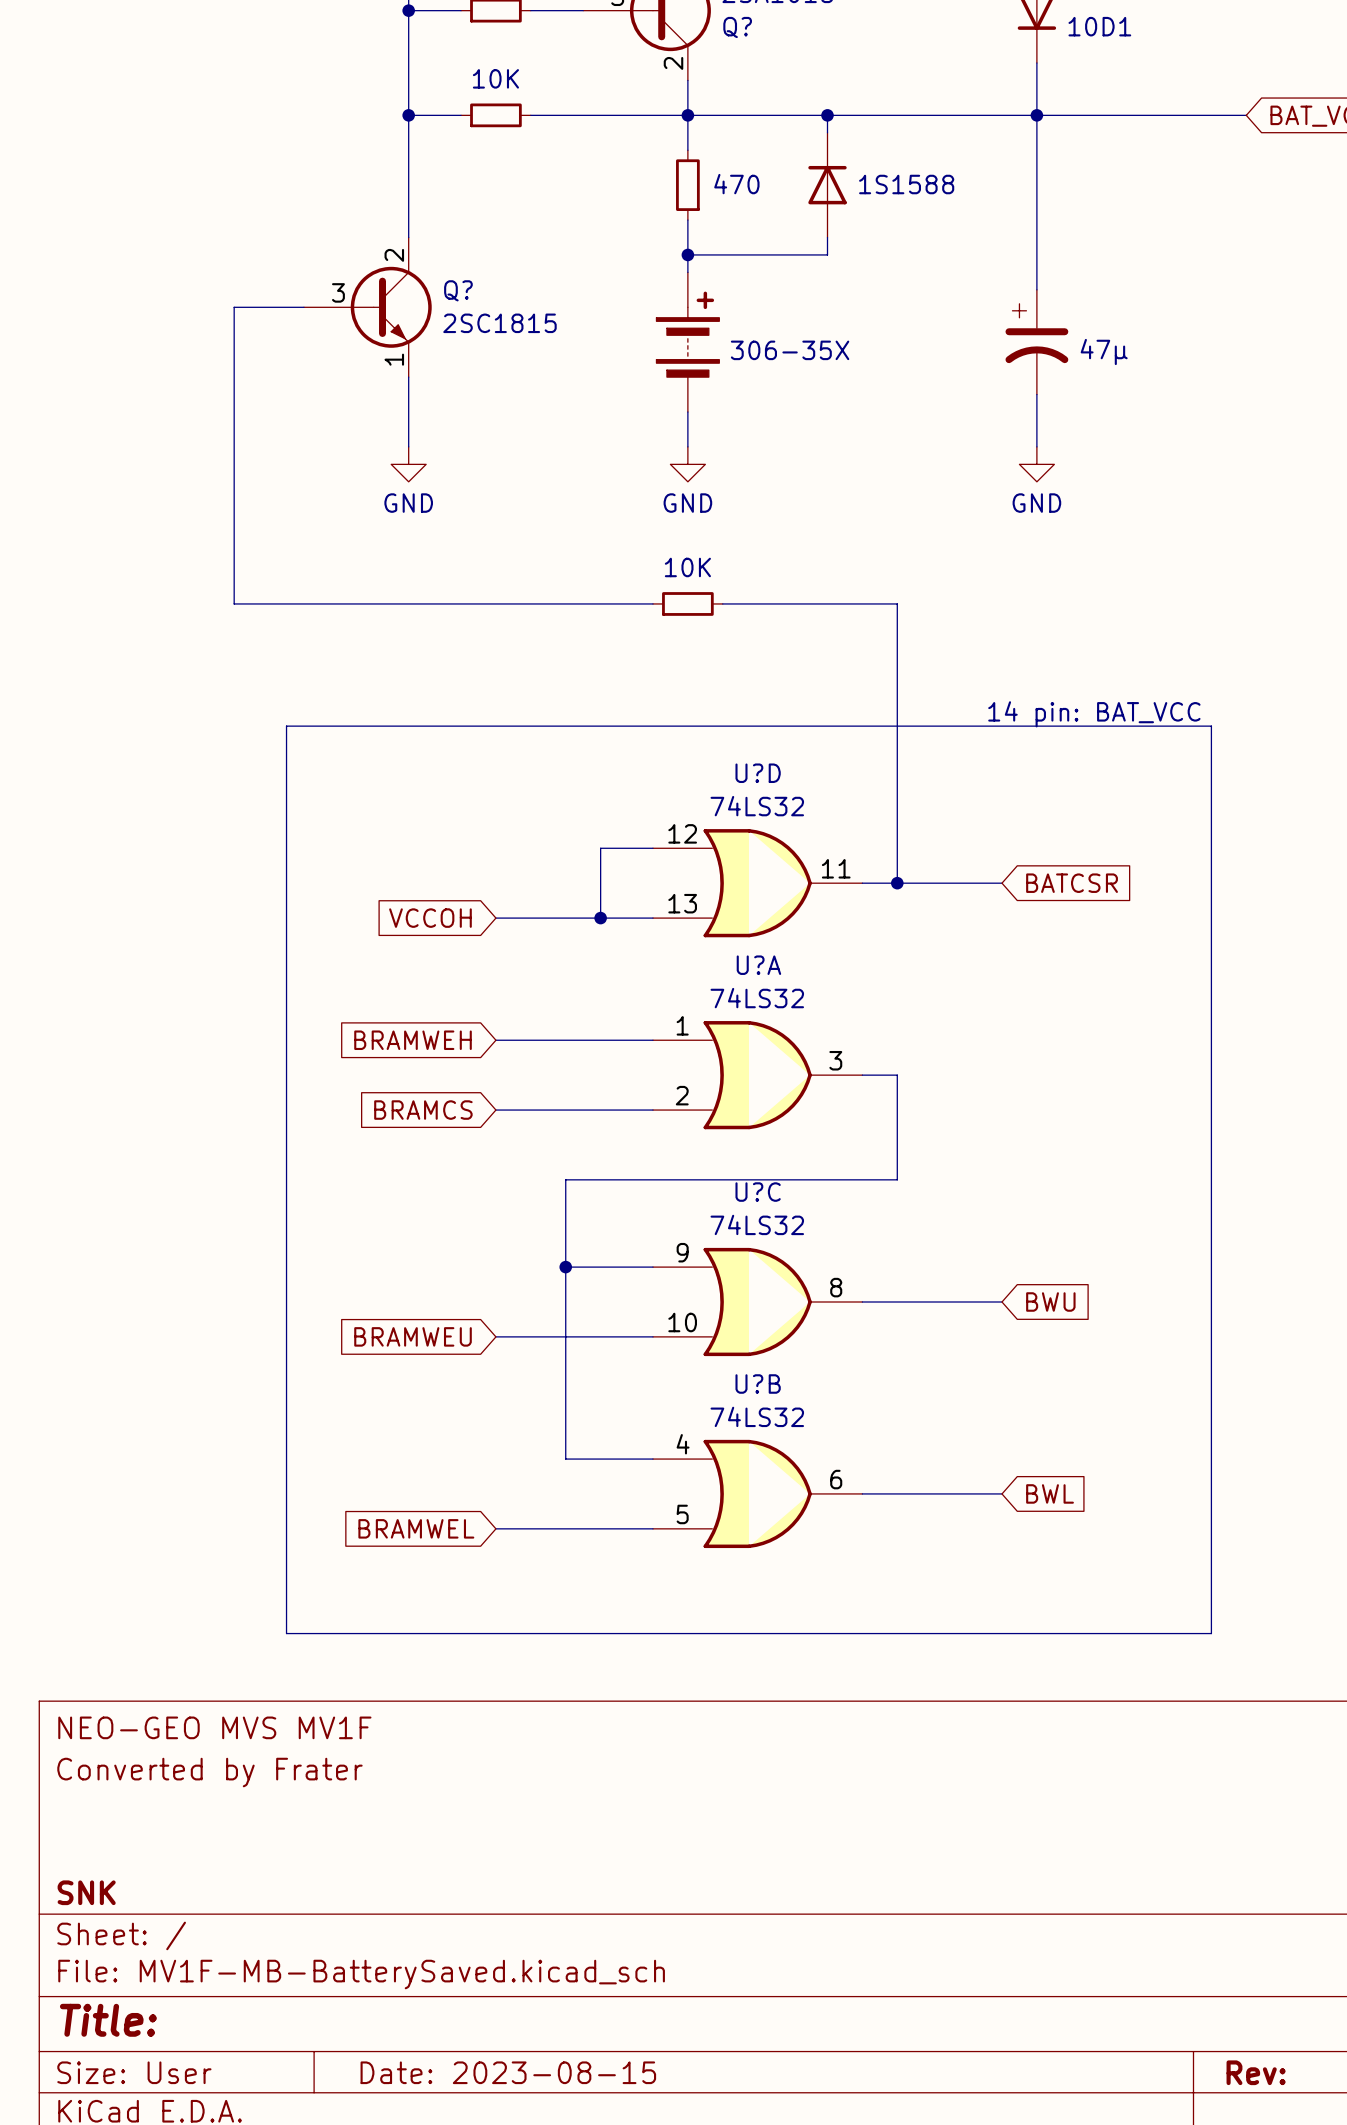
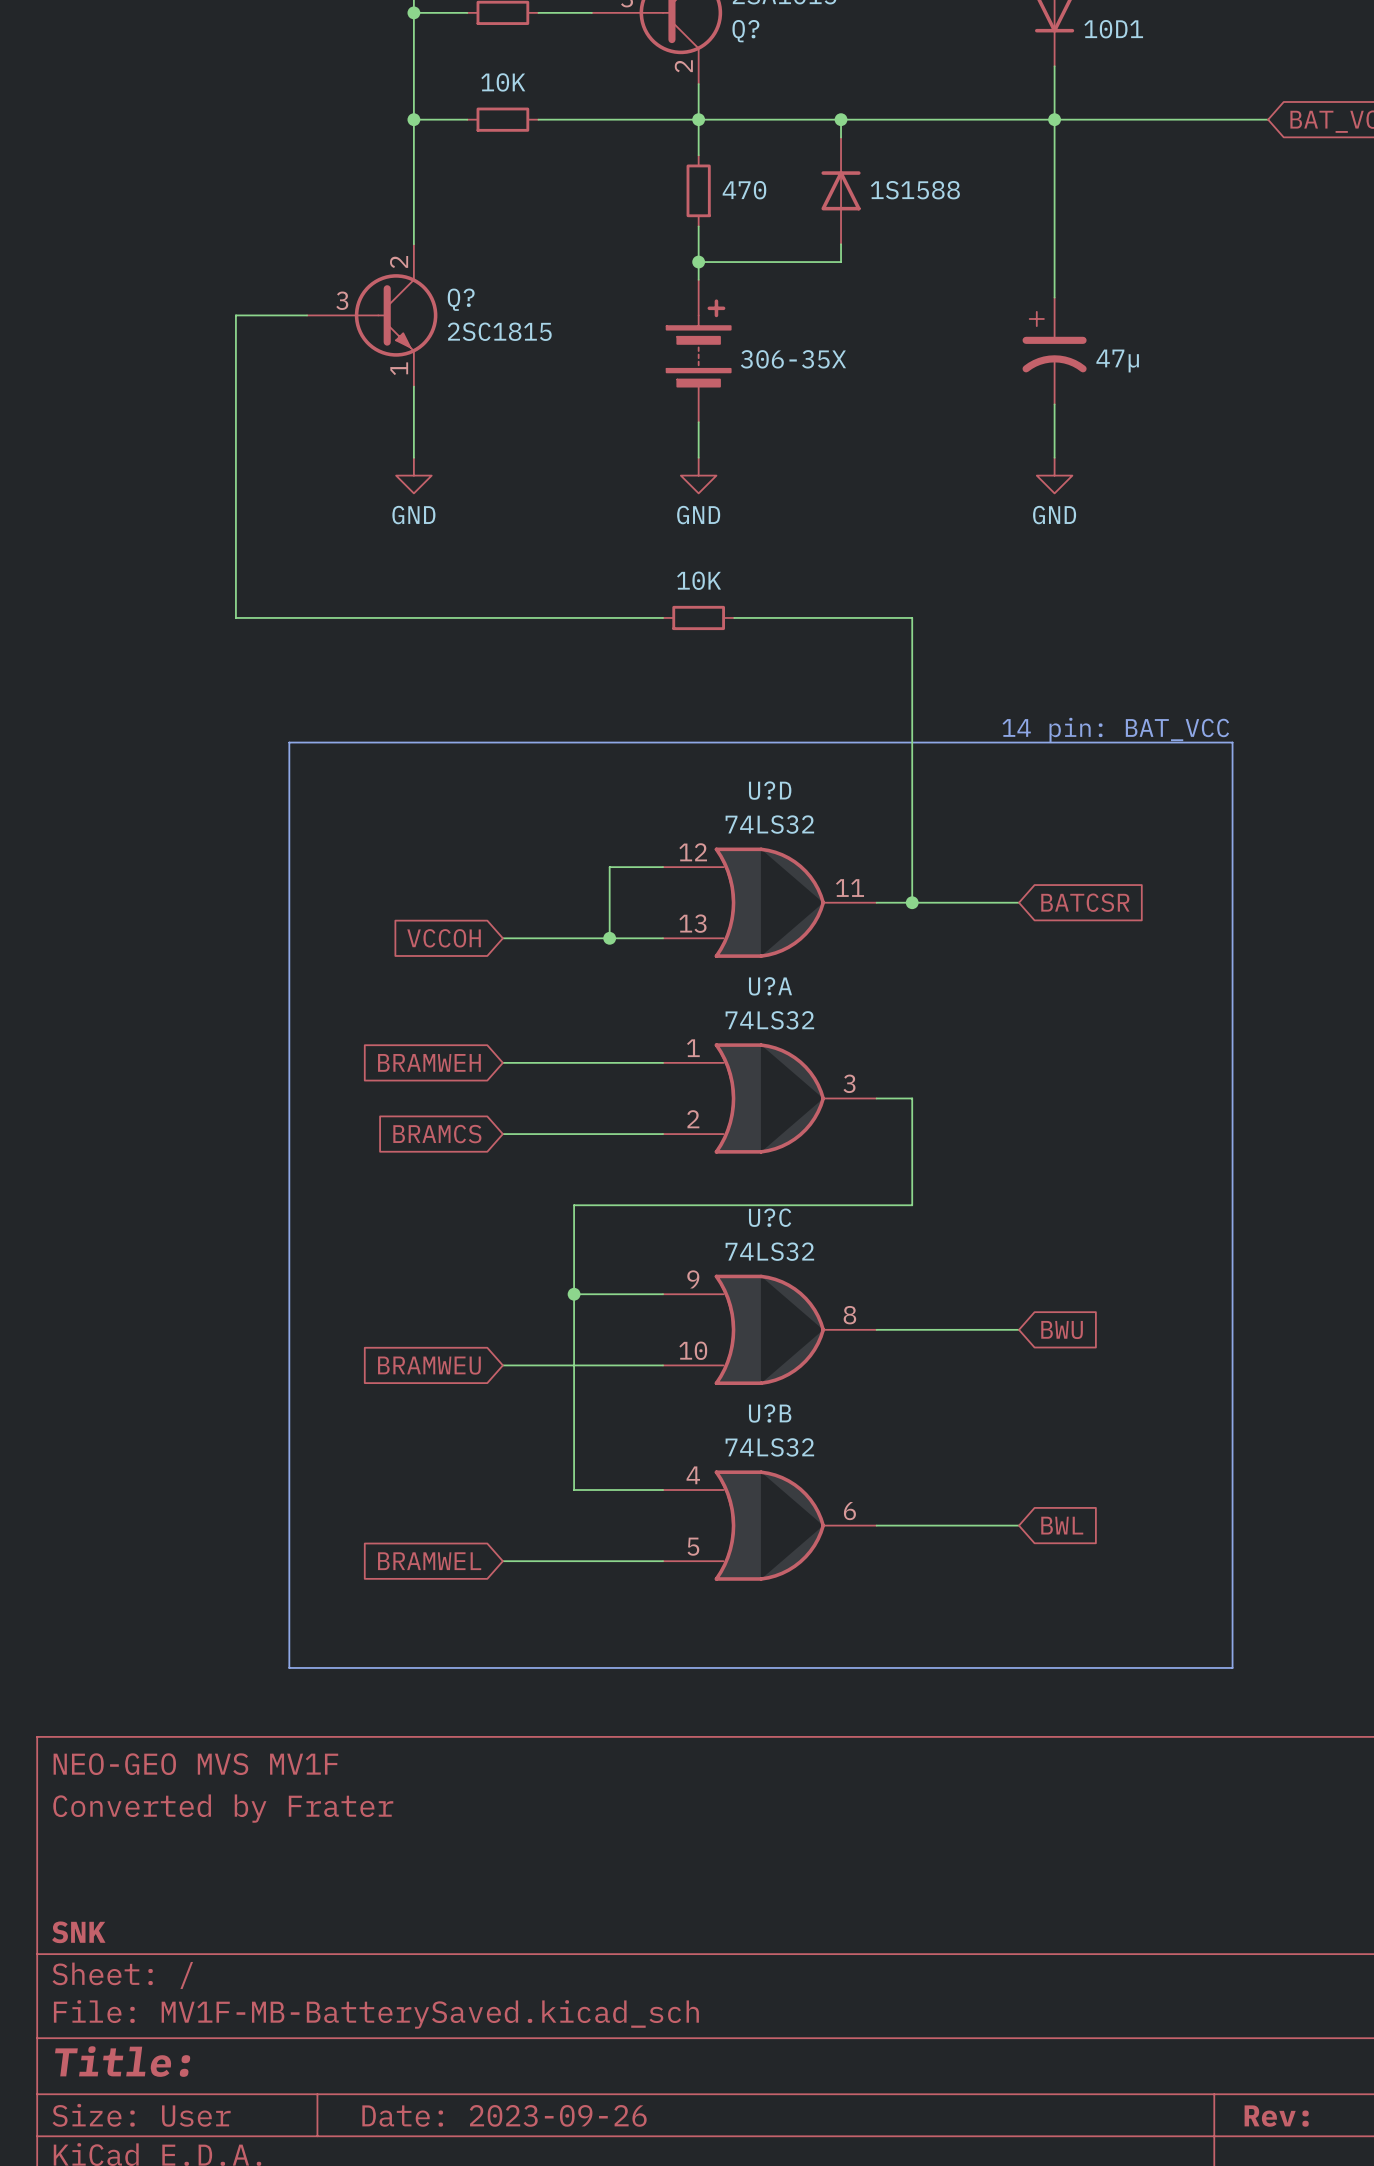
title block: Date: 2023-08-15 (508, 2072) -> Date: 2023-09-26 (504, 2115)

